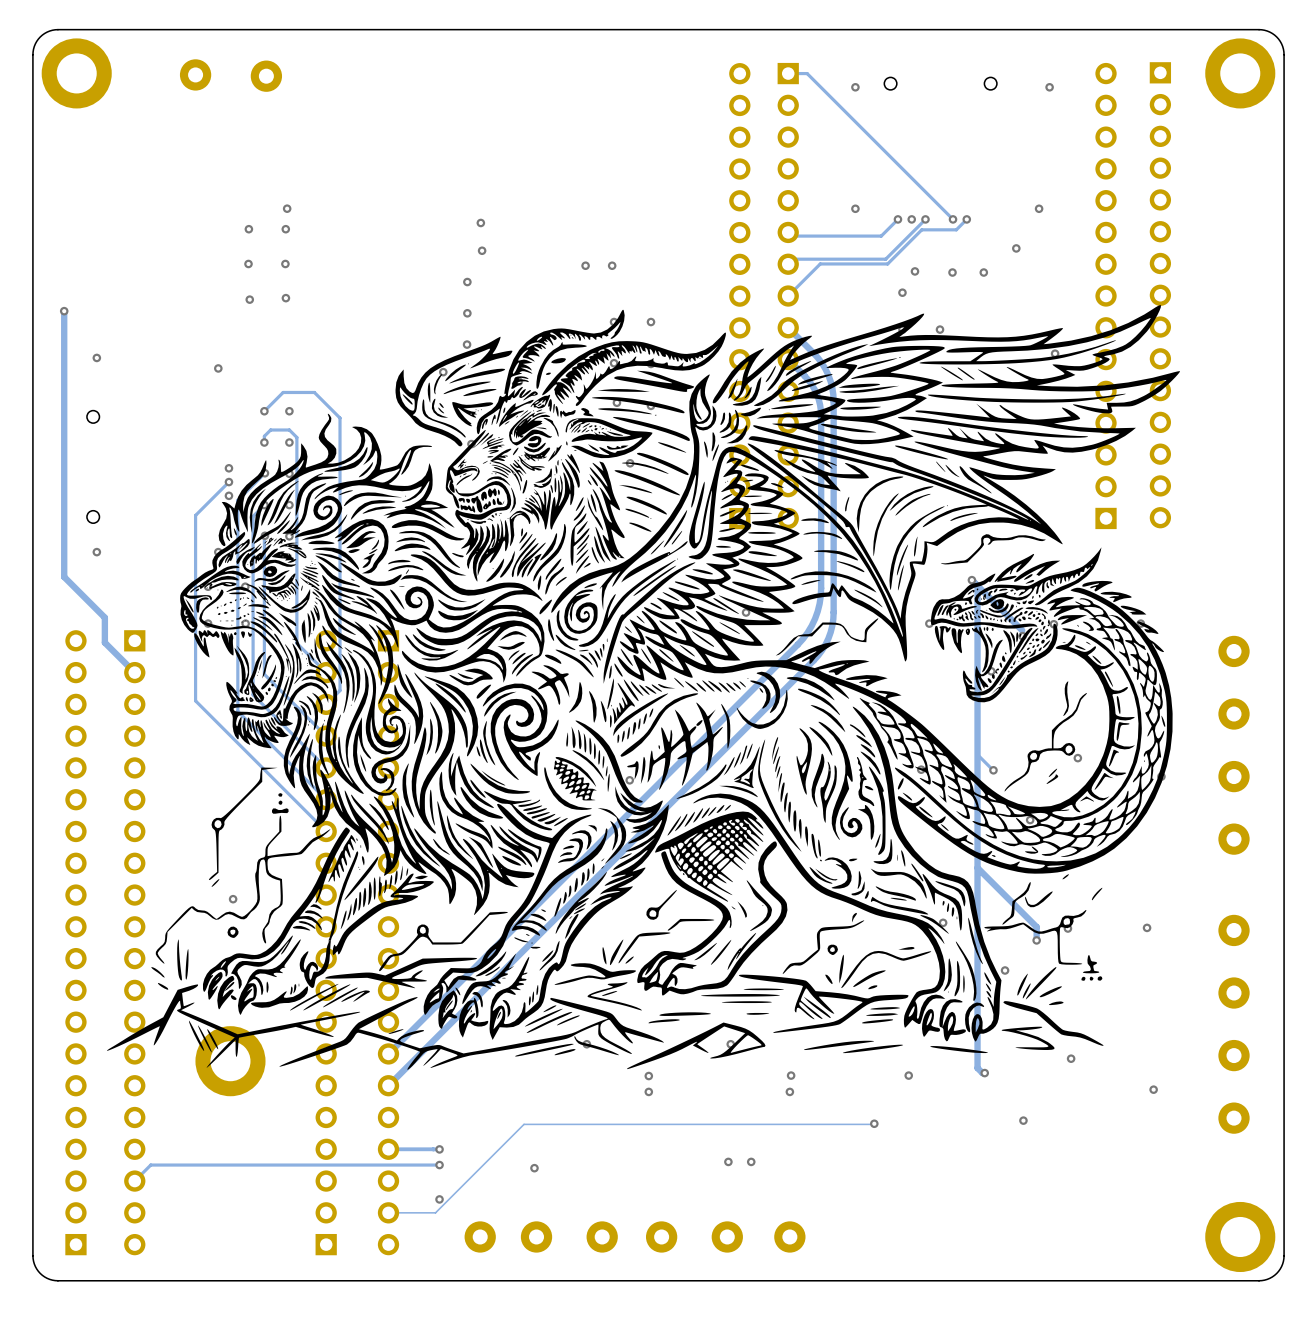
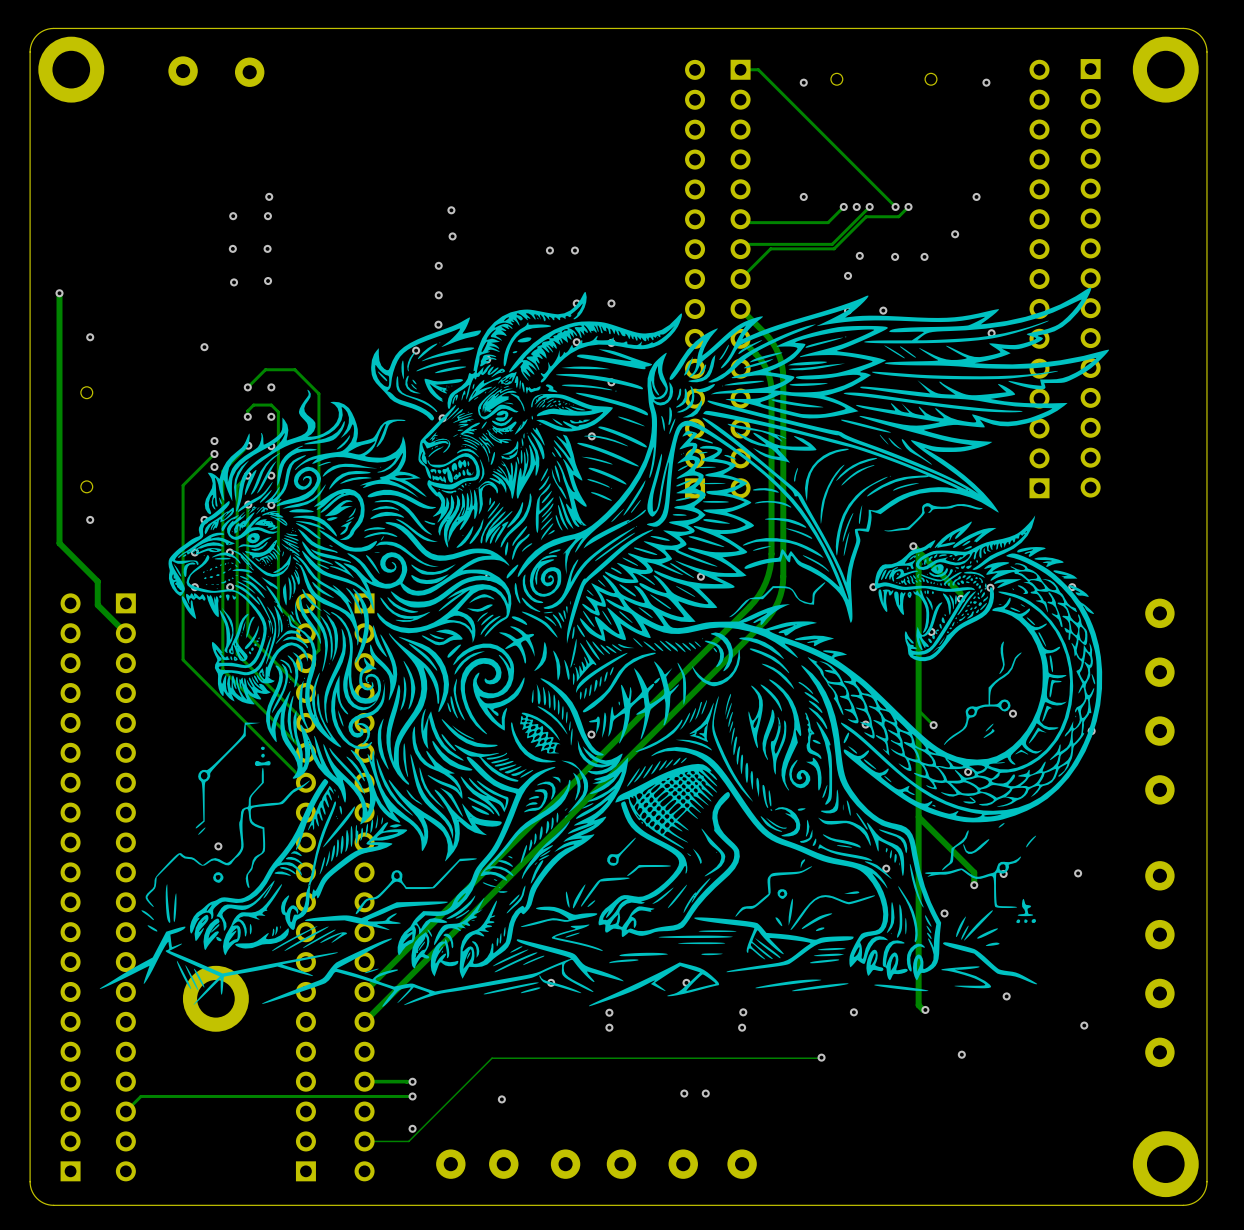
via: (616, 402) -> none

